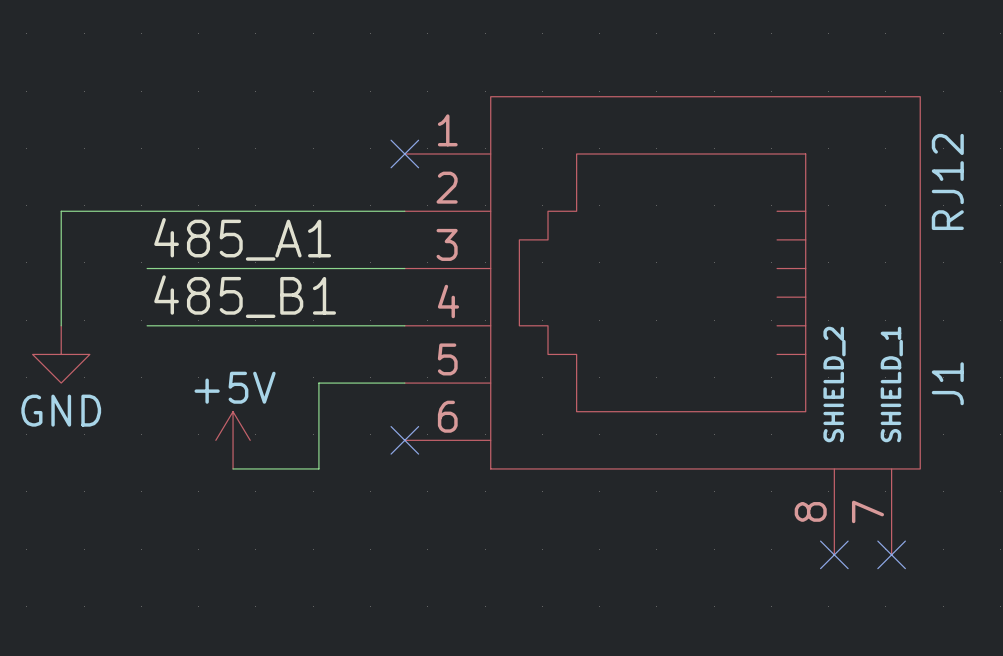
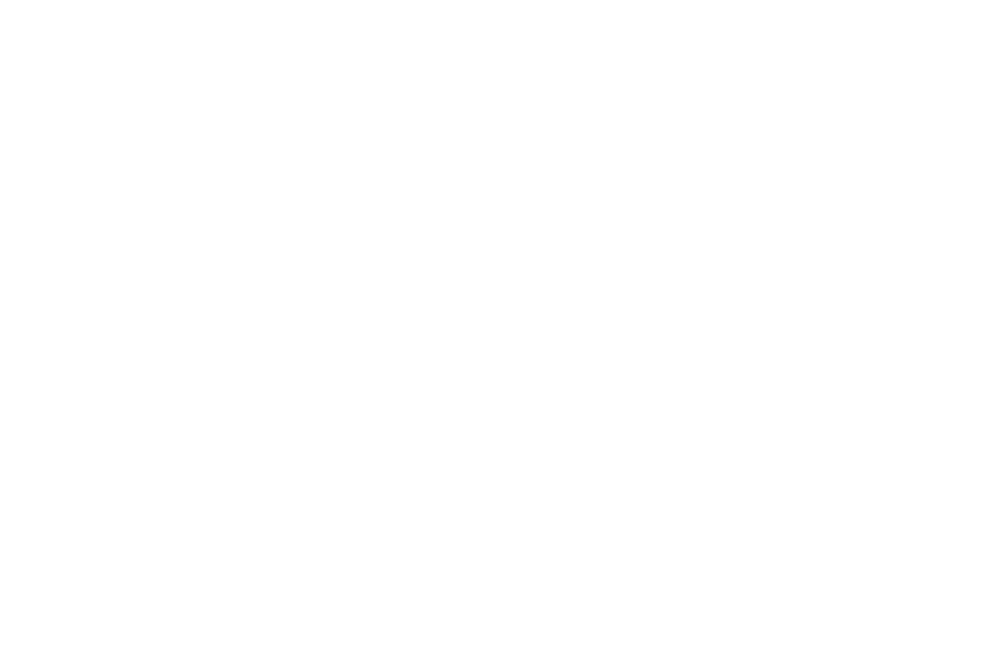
no-connect mark: (404, 153) -> none
wire: (404, 211) (61, 211) (61, 325) -> none
label: 485_A1 (242, 239) -> none
wire: (147, 268) (404, 268) -> none
label: 485_B1 (245, 296) -> none
wire: (147, 325) (404, 325) -> none
J1: RJ12 (662, 325) -> none
power symbol: GND (61, 354) -> none
wire: (404, 383) (318, 383) (318, 468) (233, 468) -> none
power symbol: +5V (233, 440) -> none
no-connect mark: (404, 440) -> none
no-connect mark: (834, 554) -> none
no-connect mark: (891, 554) -> none

